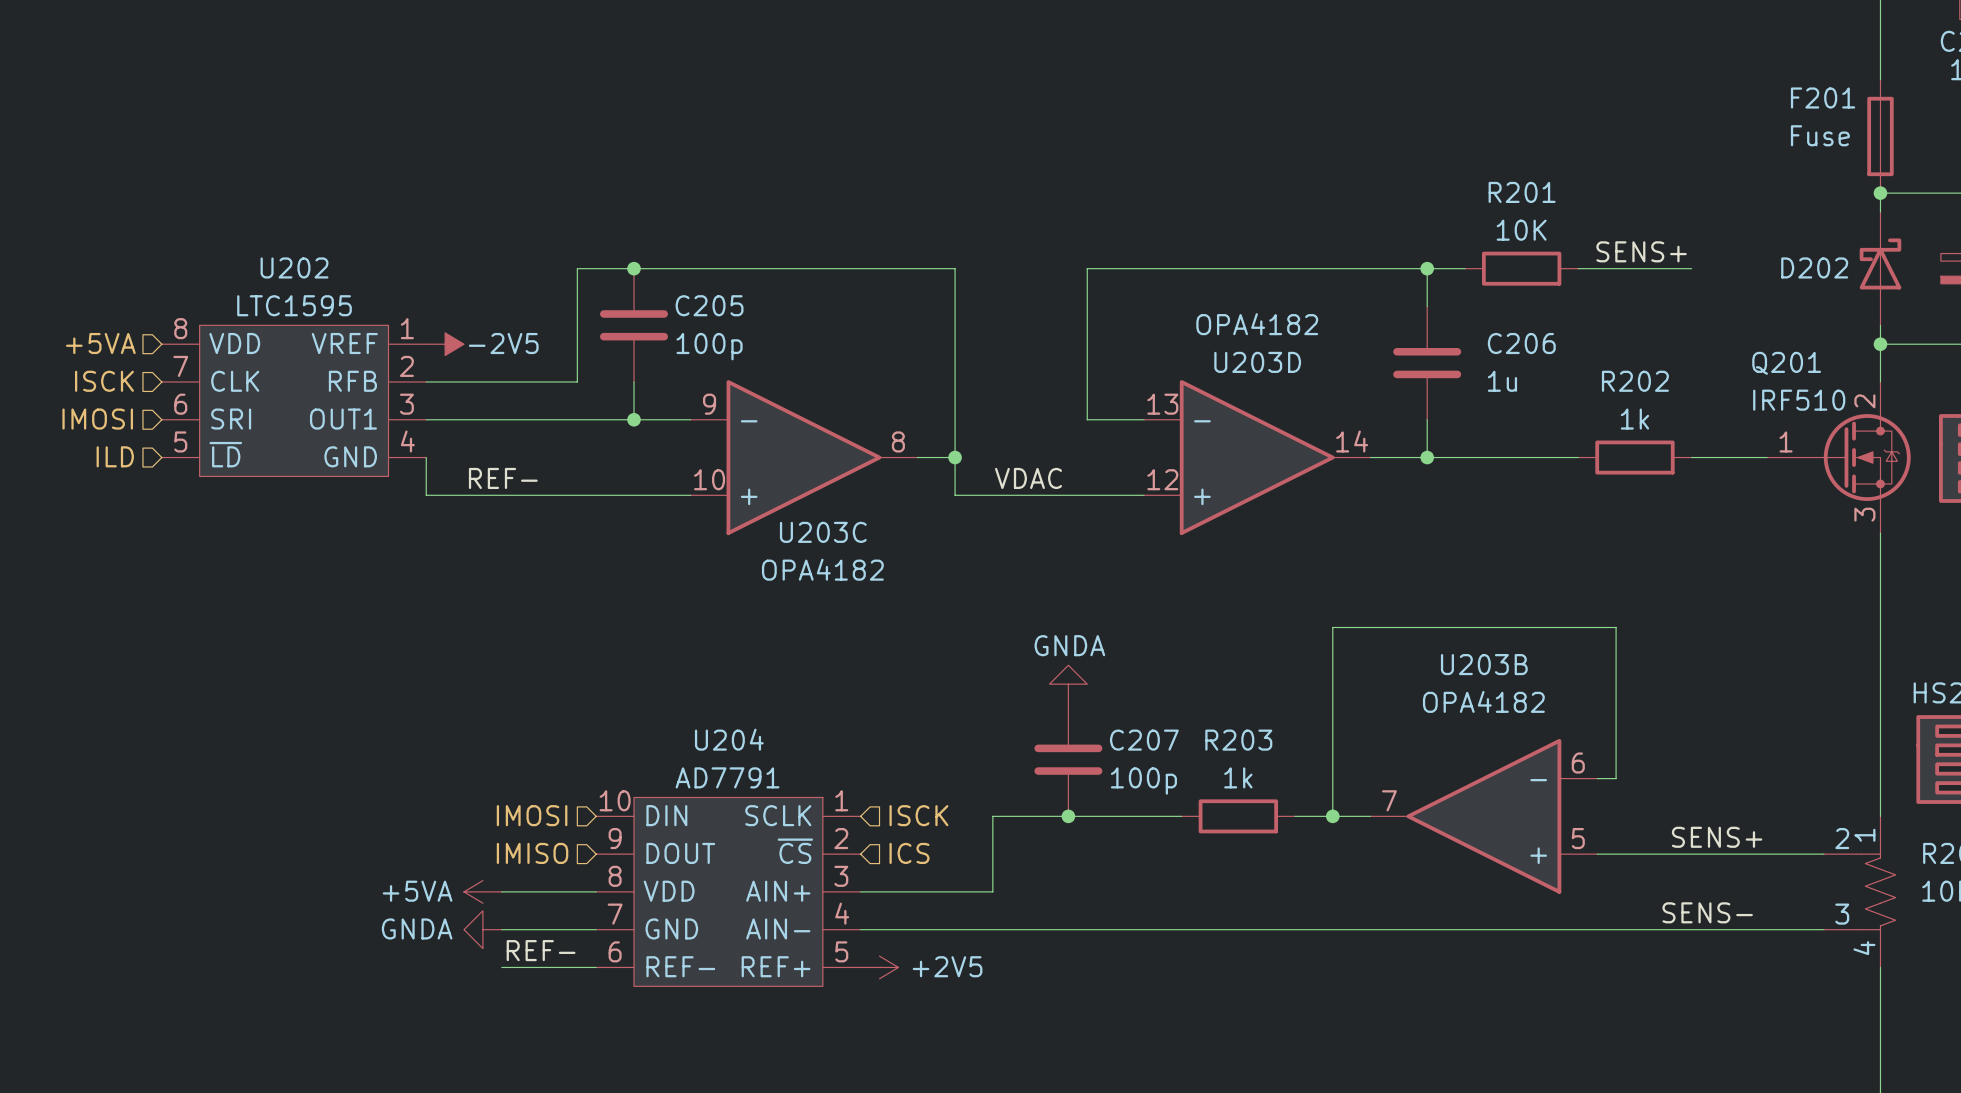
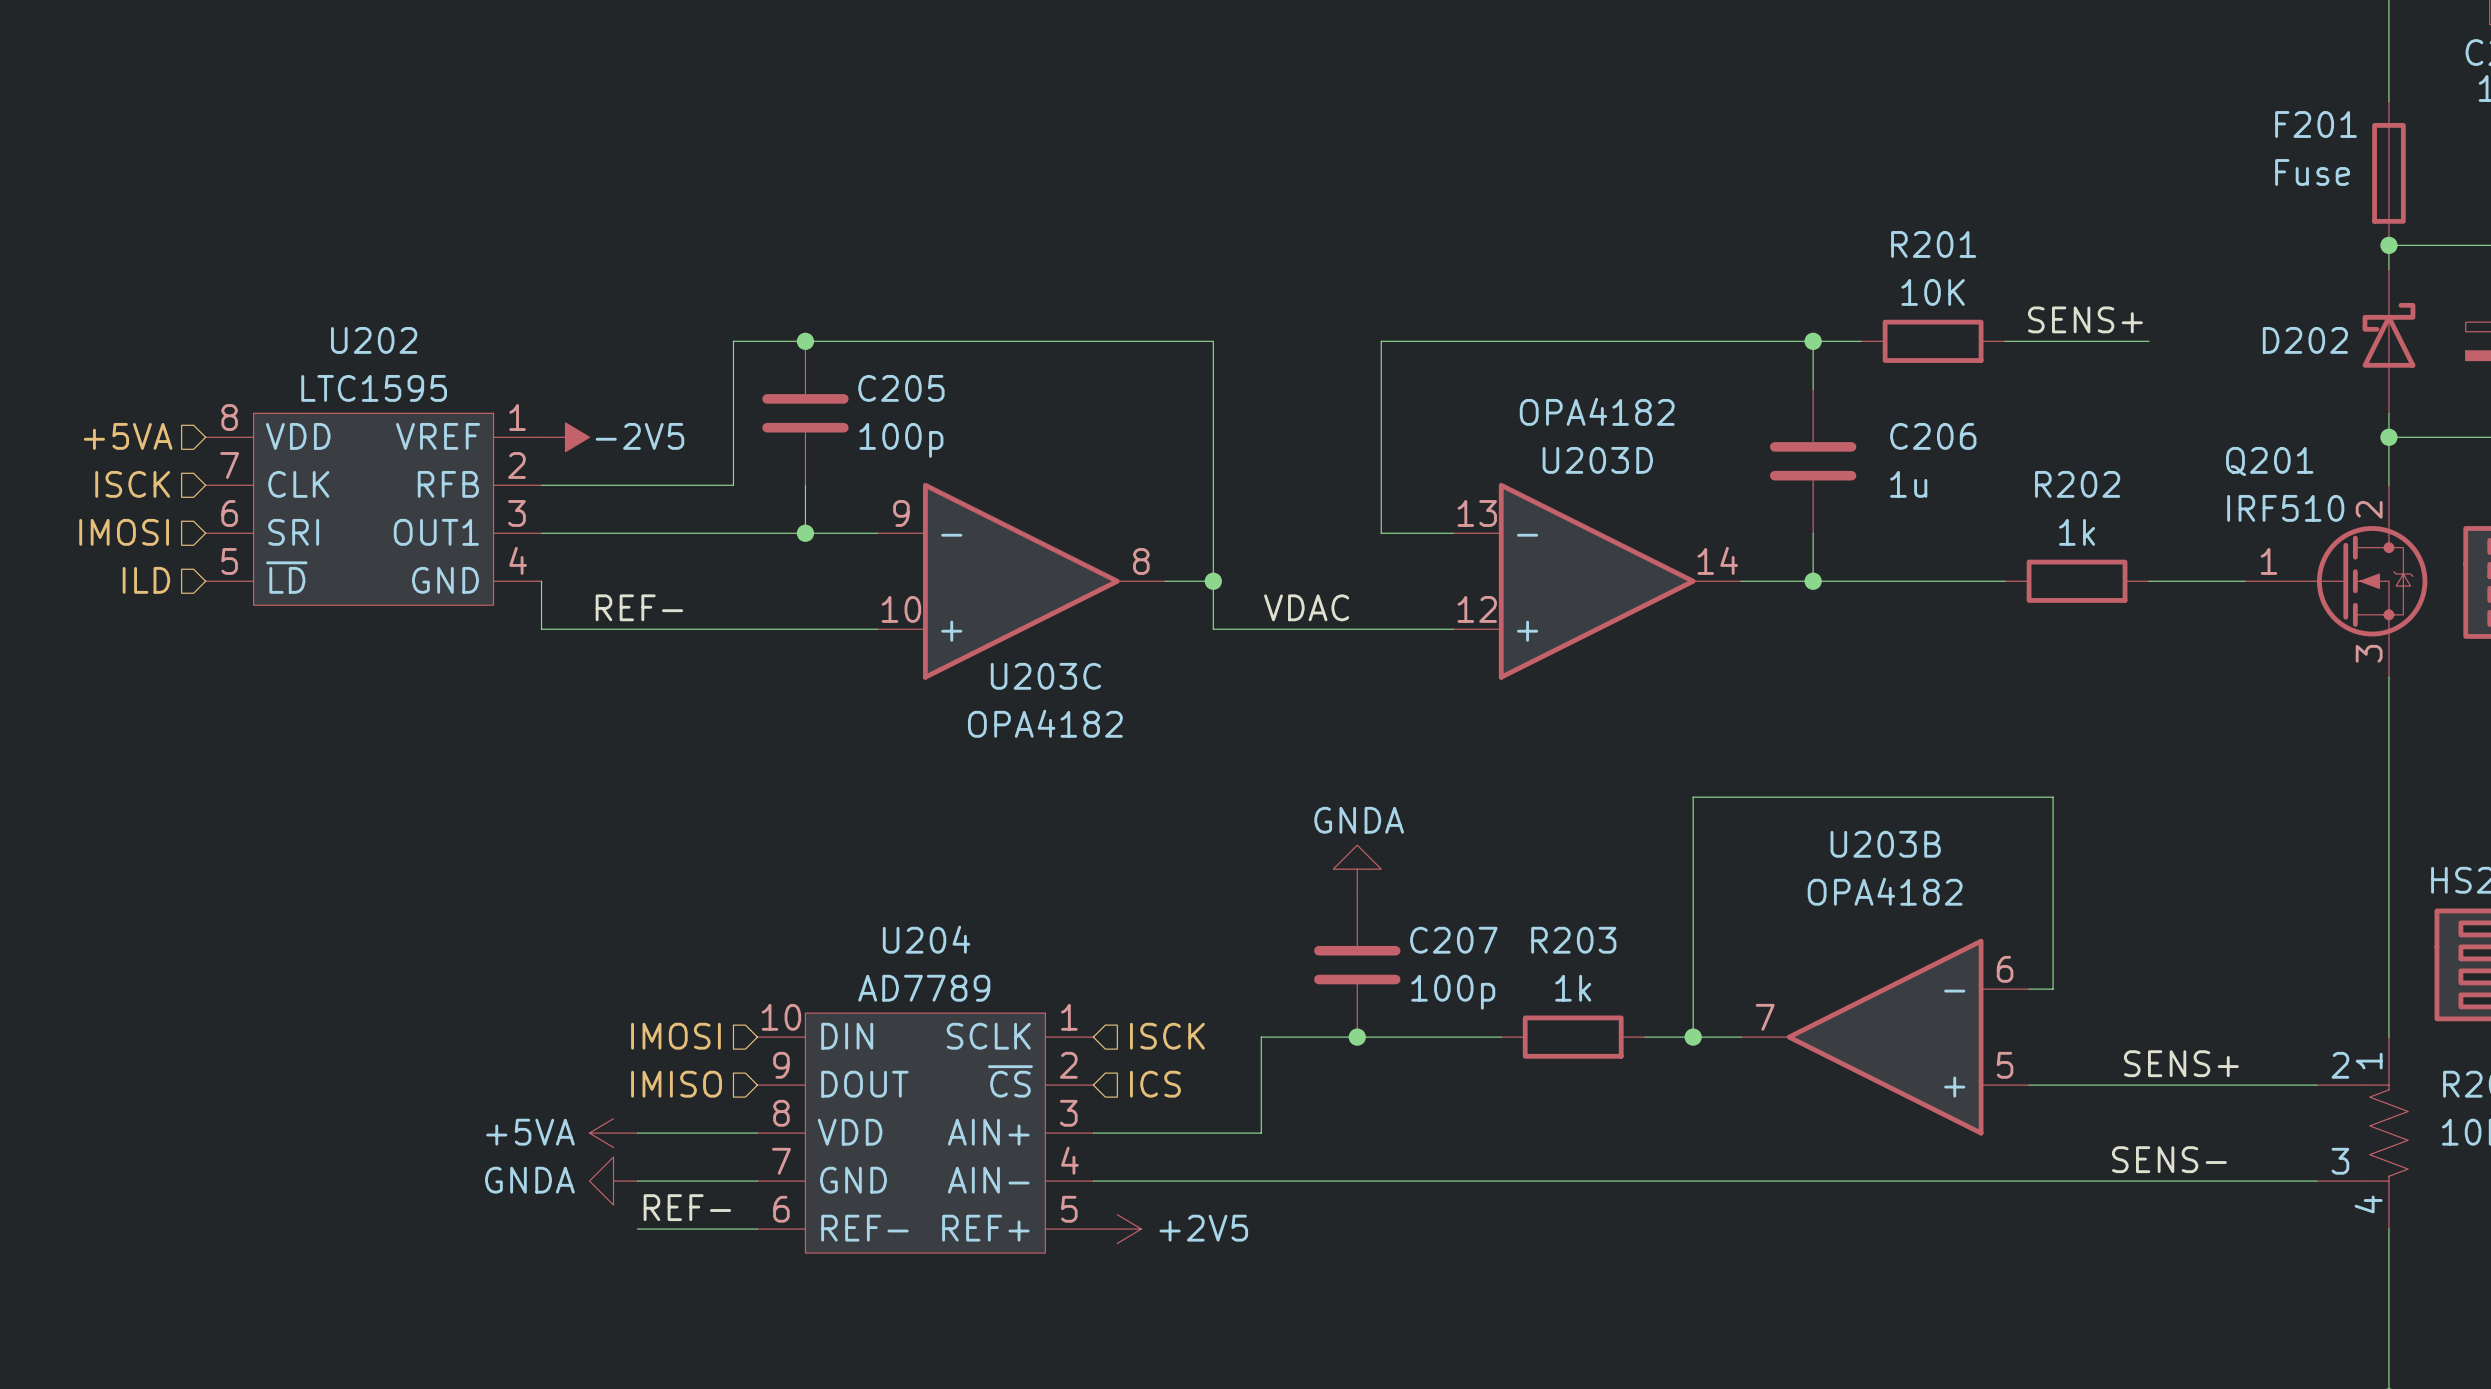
U204 value: AD7791 (727, 777) -> AD7789 (924, 988)

